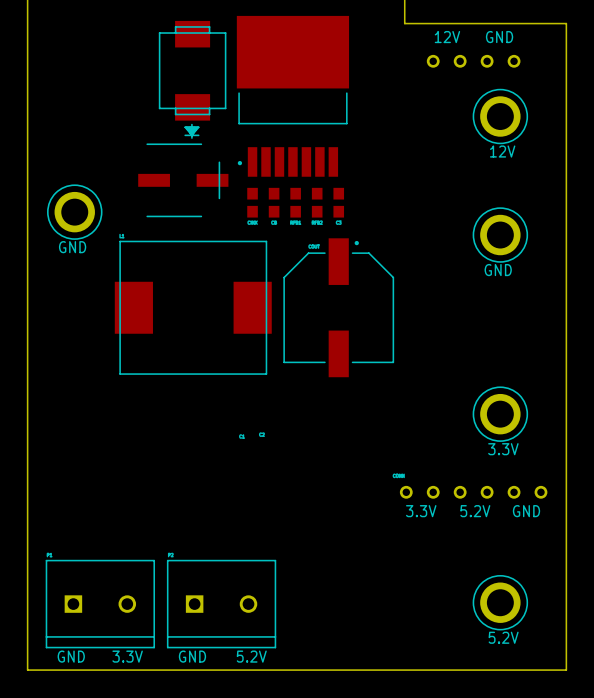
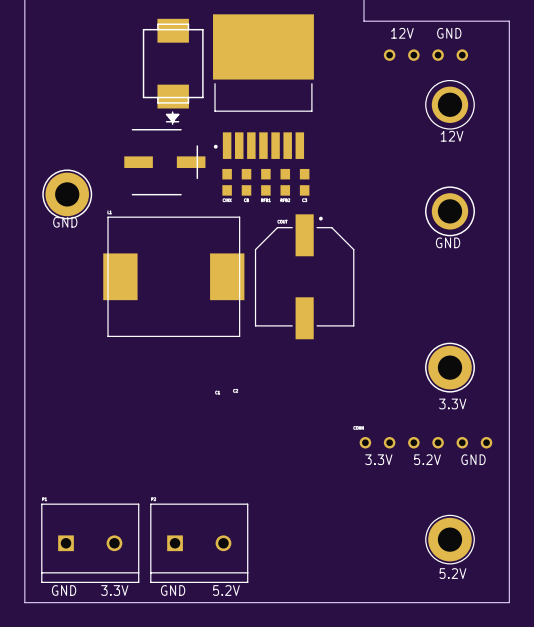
part footprint: [47, 184, 103, 240] -> [42, 169, 93, 220]
part footprint: [472, 386, 529, 442] -> [425, 342, 475, 393]
part footprint: [472, 575, 528, 631] -> [425, 514, 475, 565]

